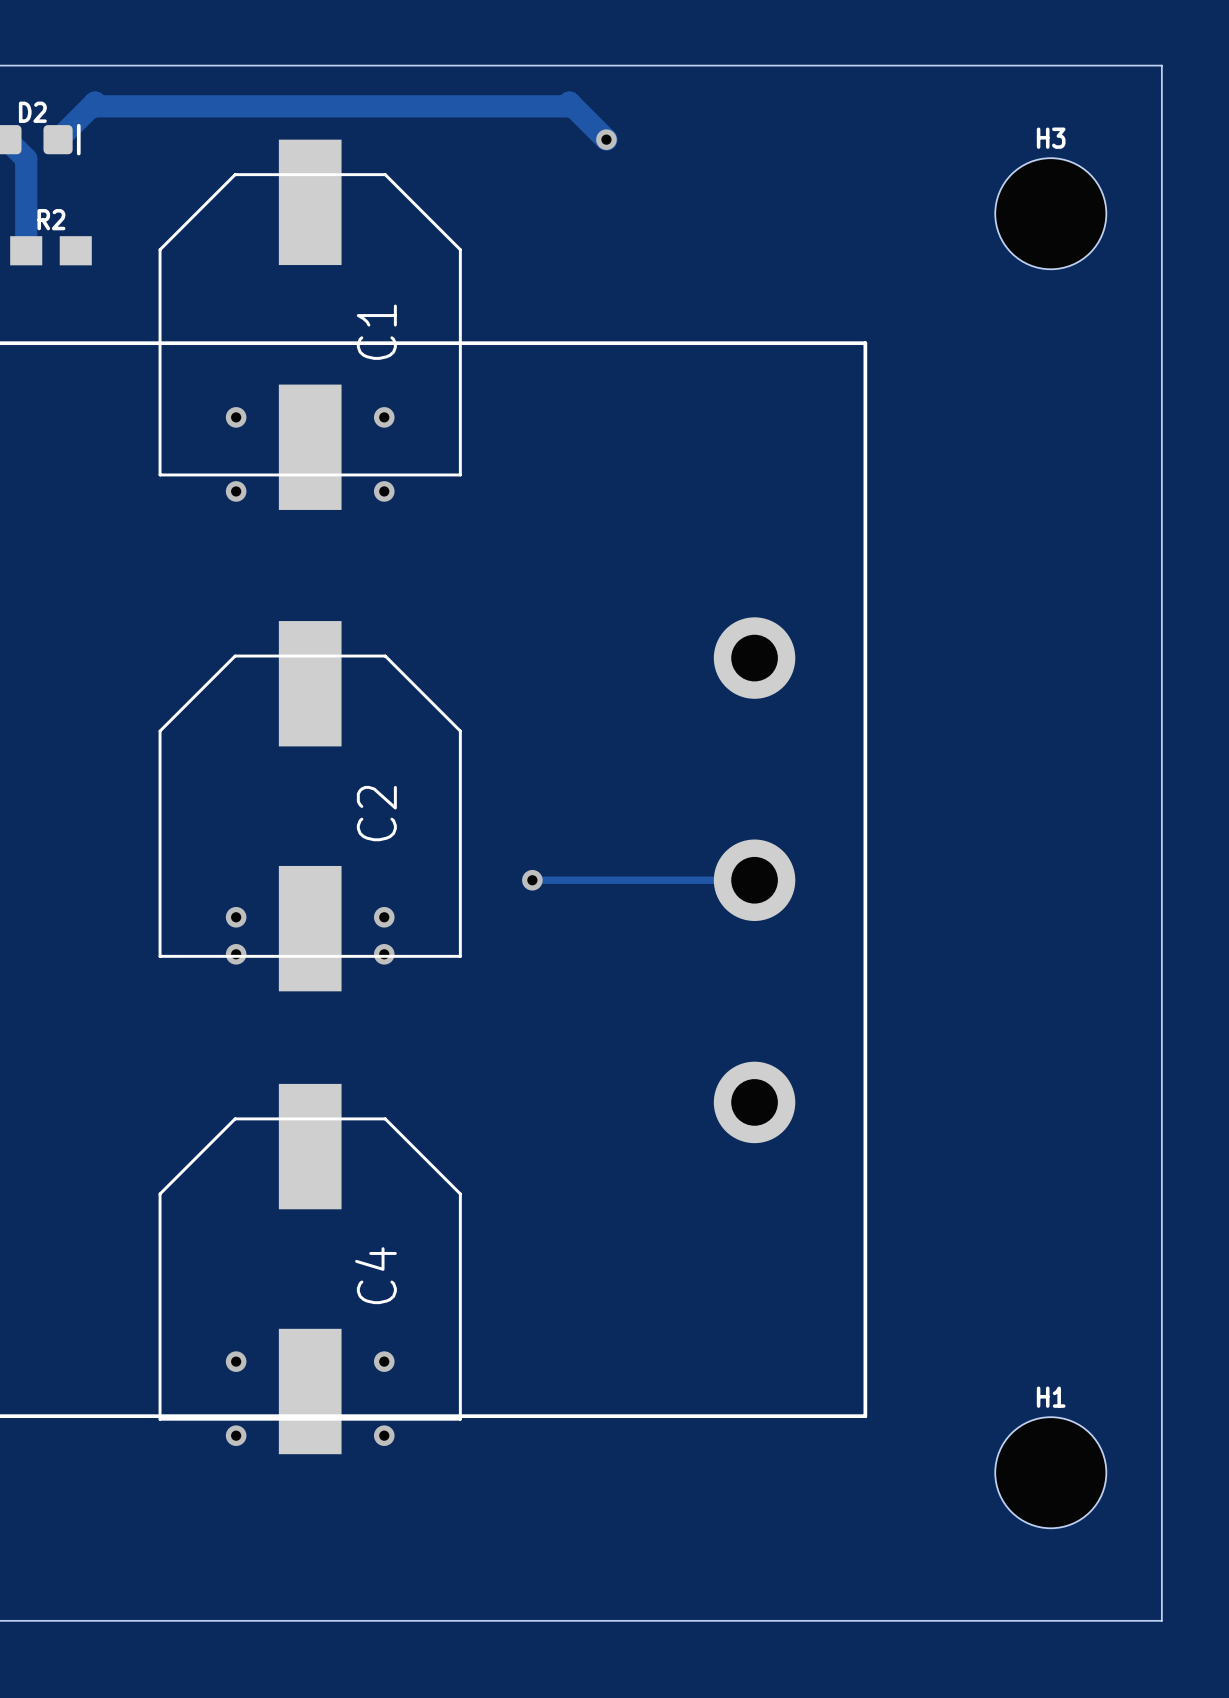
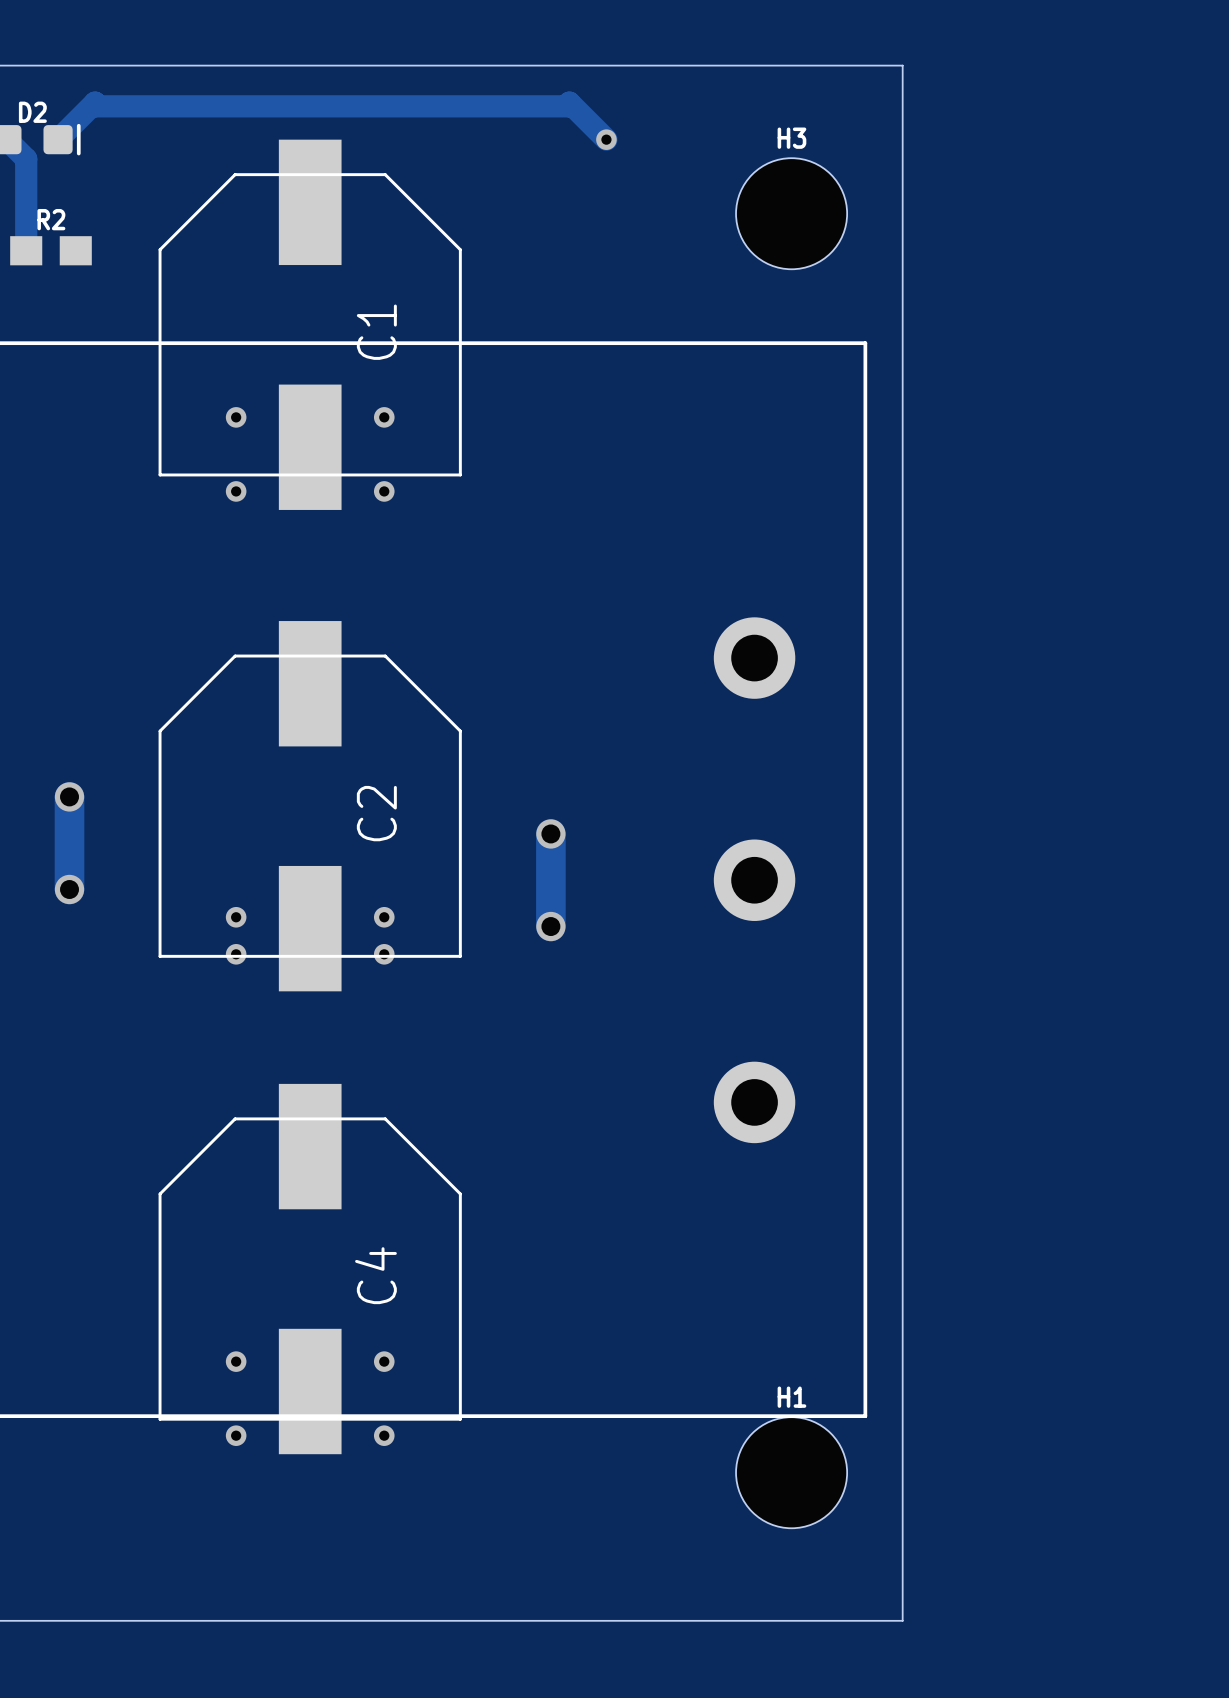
board edge: (902, 65) (1161, 65) (1161, 1620) (902, 1620) -> (902, 65) (902, 1620)
H3 position: (1050, 213) -> (791, 213)
track: none -> (69, 796) (69, 889)
via: none -> (69, 796)
track: none -> (550, 833) (550, 926)
via: none -> (550, 833)
track: (532, 880) (754, 880) -> none
via: (532, 880) -> none
via: none -> (69, 889)
via: none -> (550, 926)
H1 position: (1050, 1472) -> (791, 1472)

